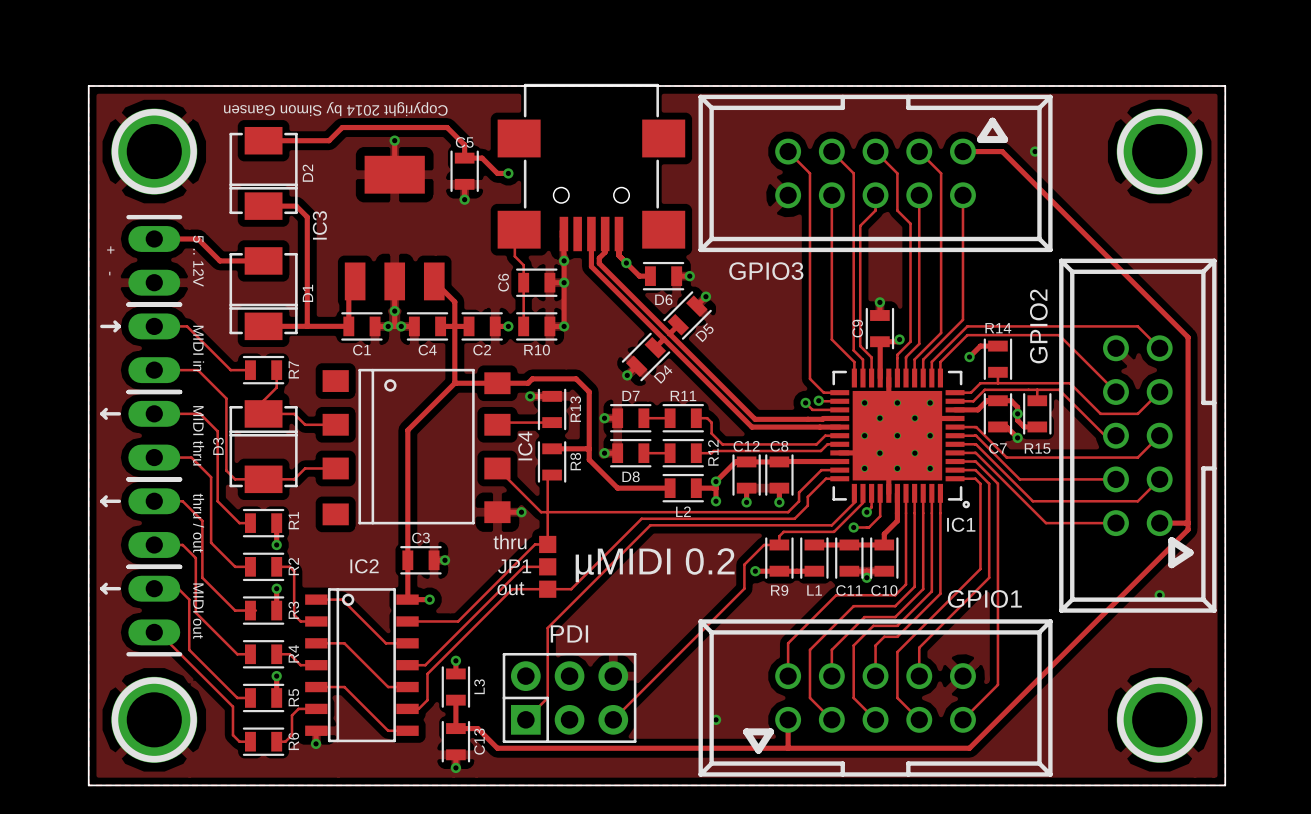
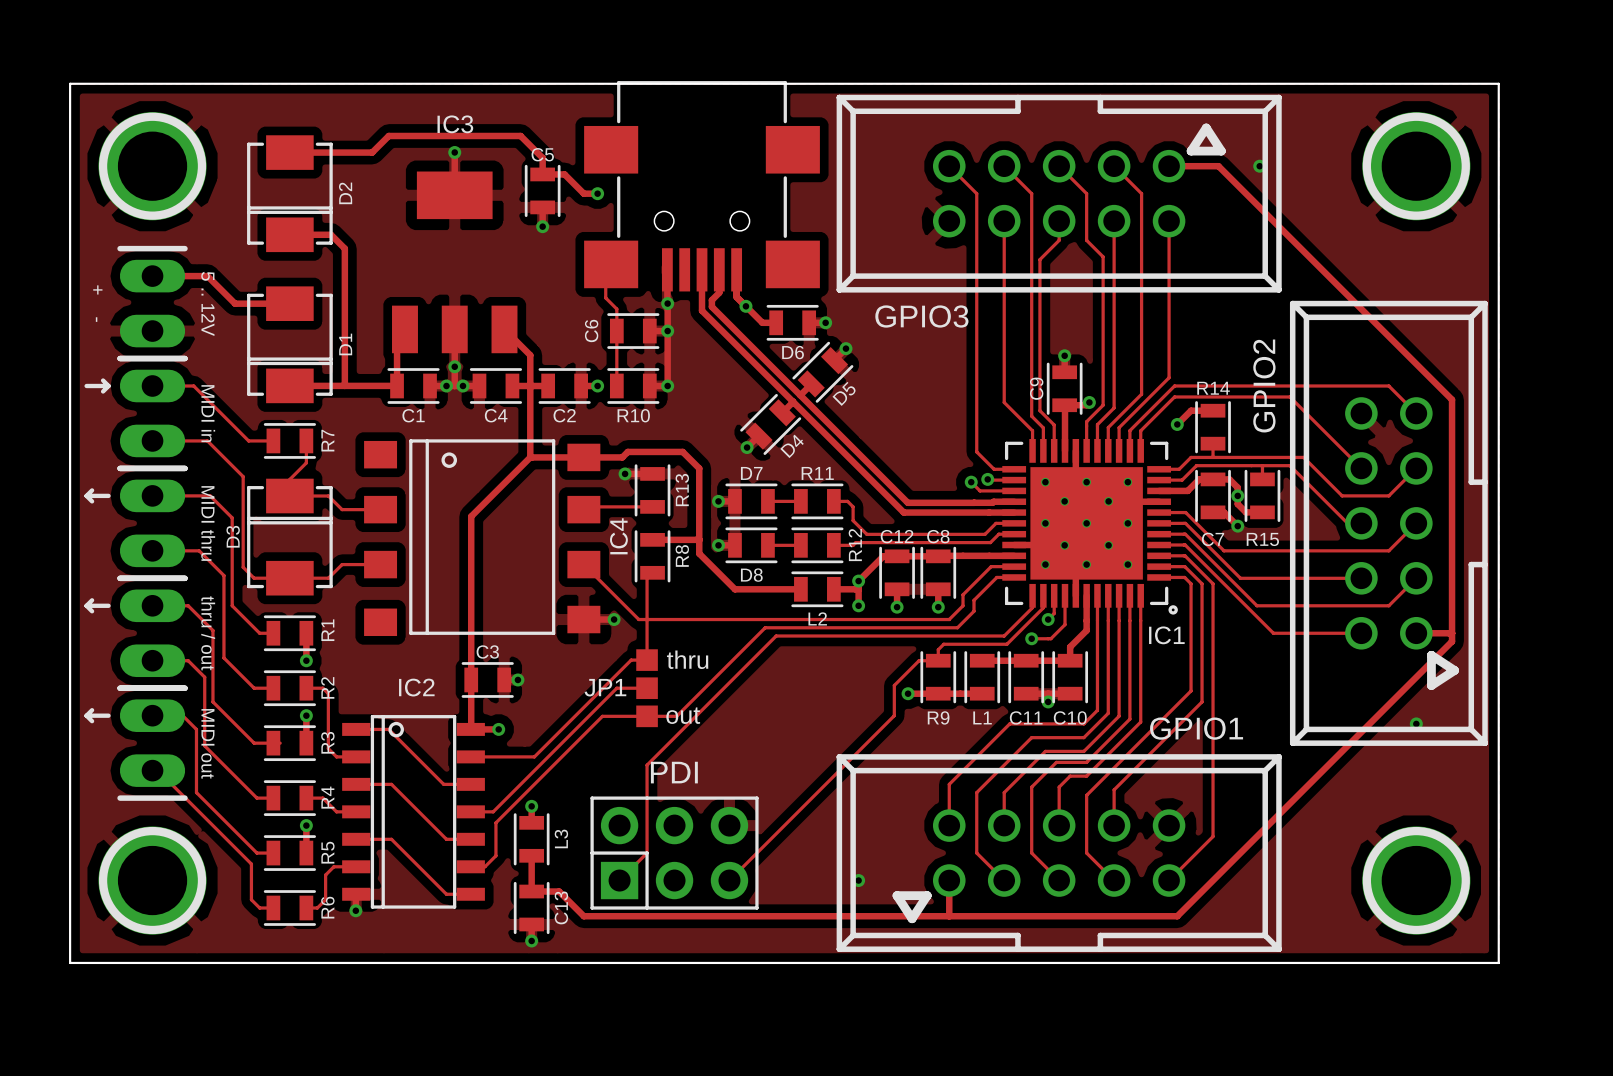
text: Copyright 2014 by Simon Gansen (335, 109) -> none
IC3 name rotation: 0° (319, 225) -> 90° clockwise (455, 124)
IC3 name position: IC3 (319, 225) -> IC3 (455, 124)
text position: thru (510, 542) -> thru (687, 659)
text: µMIDI 0.2 (655, 565) -> none
text position: out (510, 588) -> out (683, 715)

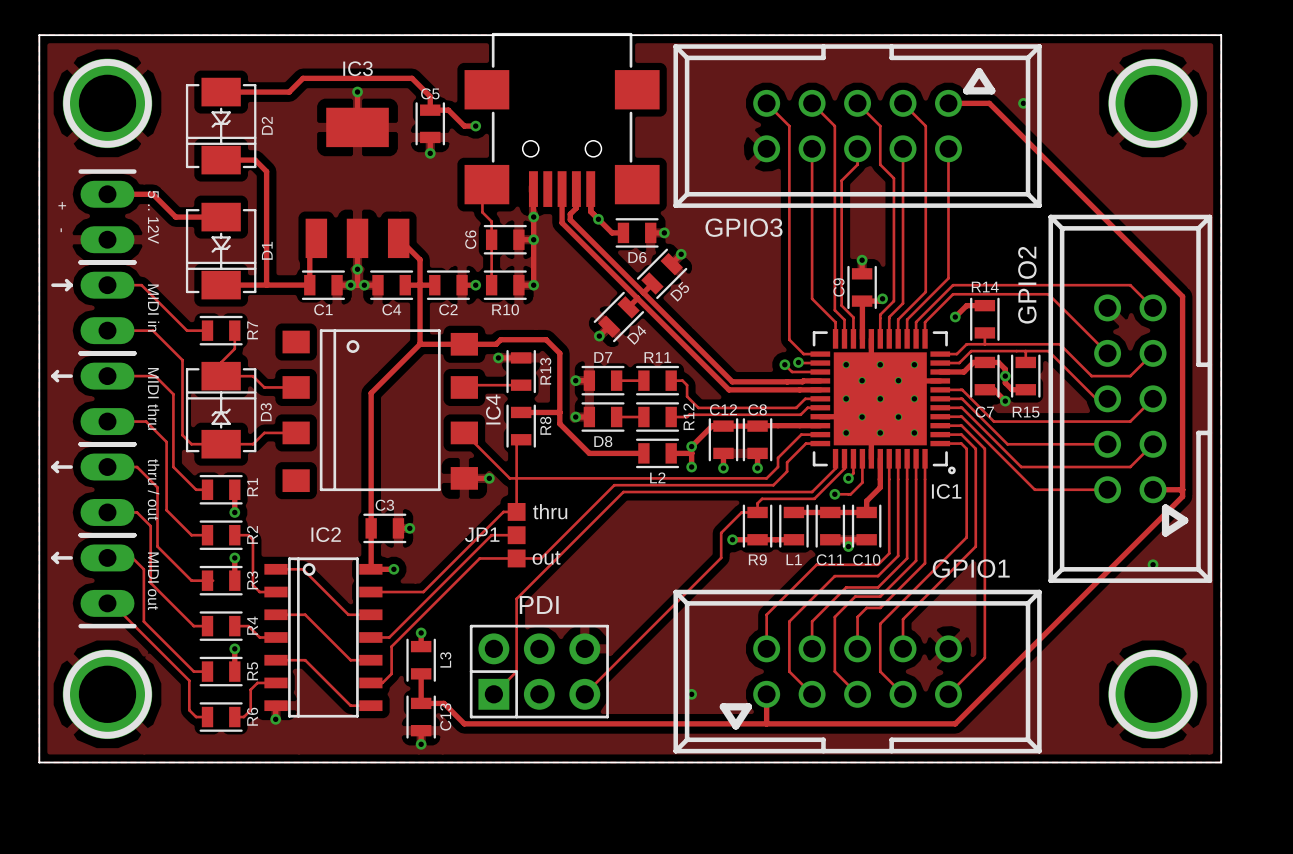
D2 footprint: [247, 135, 333, 253] -> [185, 77, 257, 175]
D1 footprint: [247, 286, 333, 404] -> [185, 202, 257, 300]
D3 footprint: [247, 478, 333, 596] -> [185, 361, 257, 459]
D3 name position: D3 (233, 536) -> D3 (266, 412)

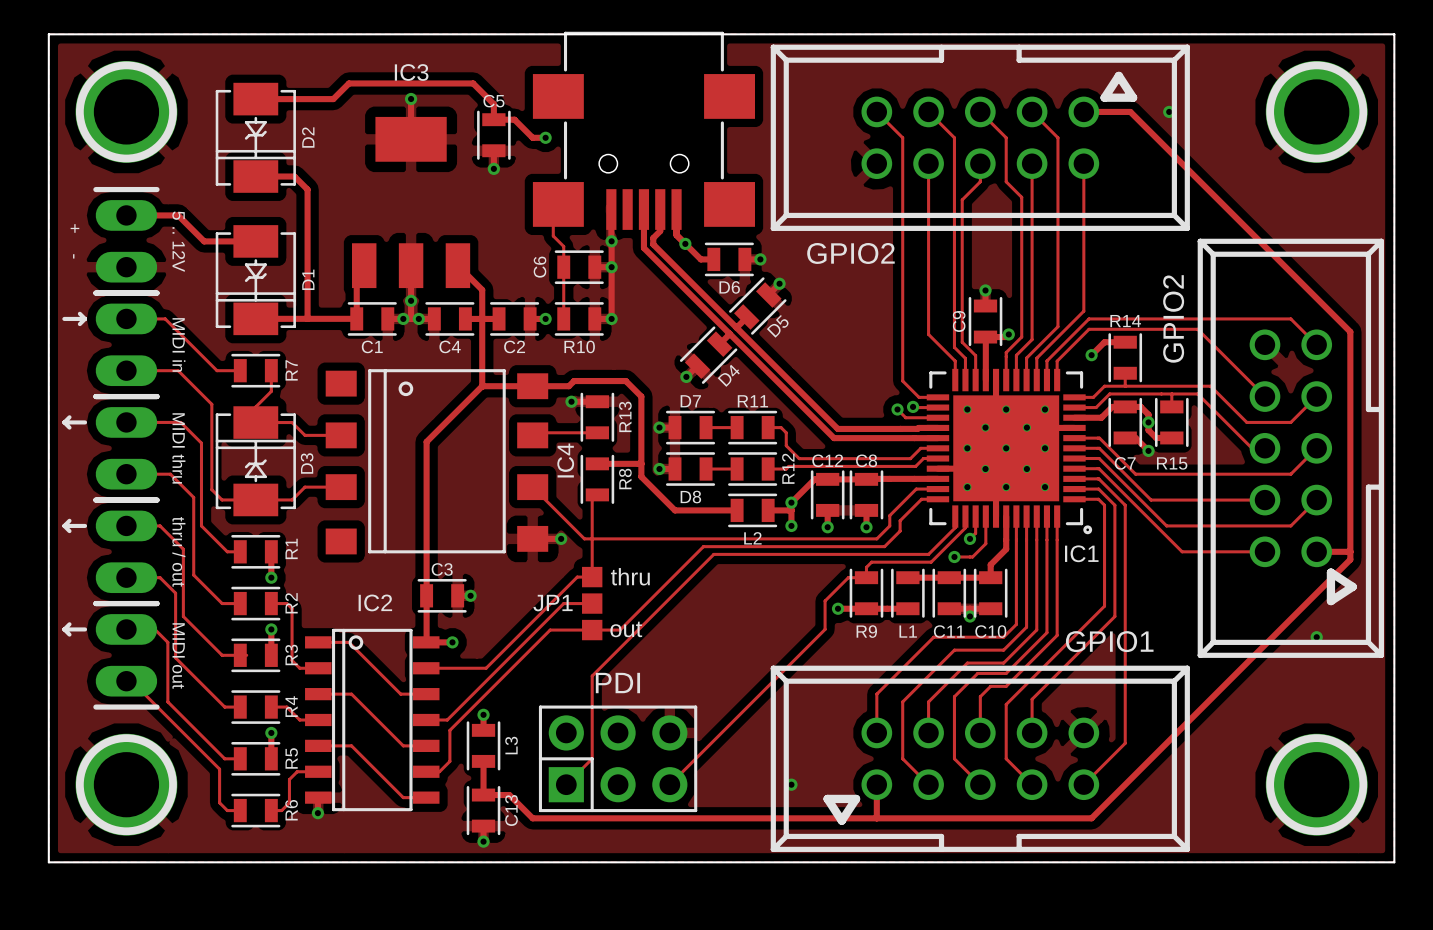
part value: GPIO3 (744, 227) -> GPIO2 (850, 253)

